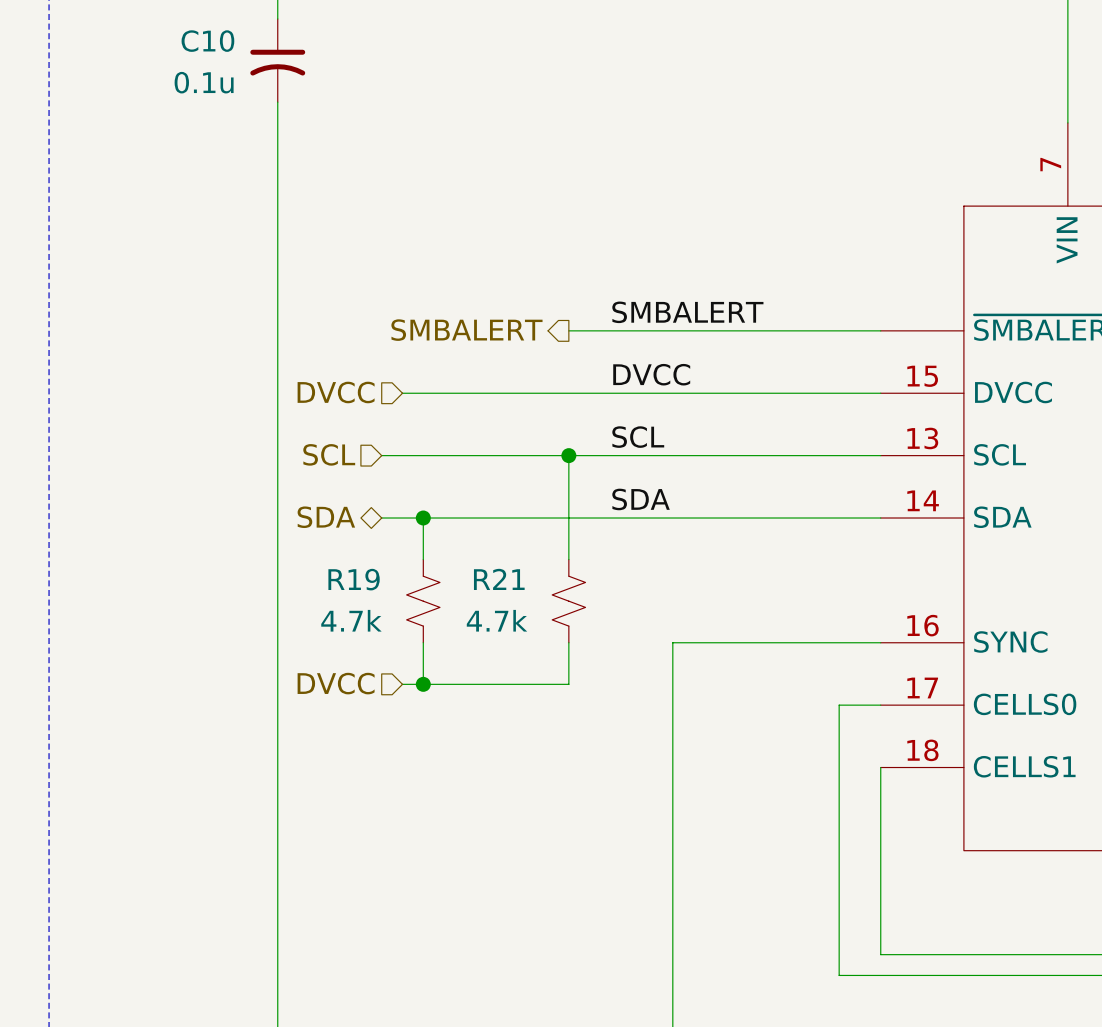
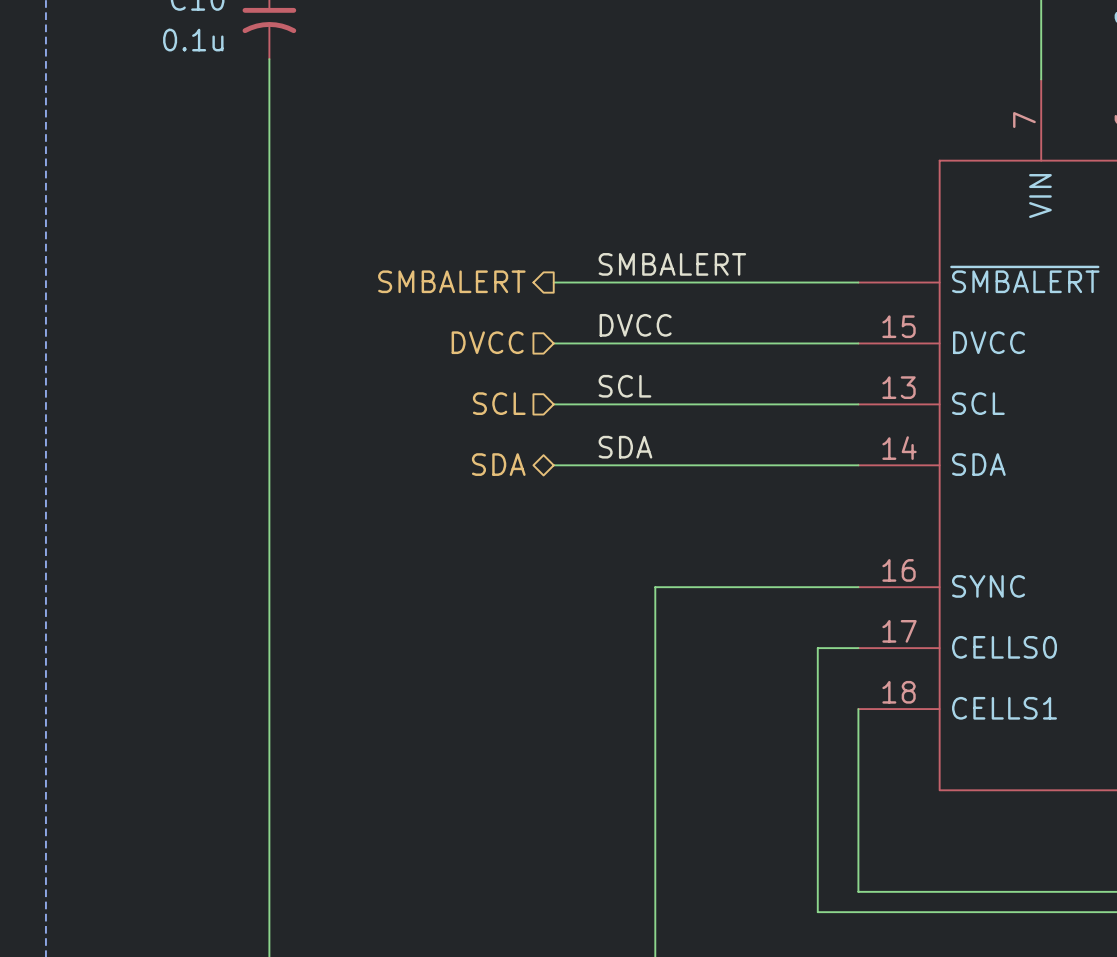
hierarchical label position: DVCC (336, 392) -> DVCC (487, 342)
wire: (402, 393) (568, 393) -> none
hierarchical label position: SCL (329, 454) -> SCL (499, 403)
wire: (381, 455) (568, 455) (568, 559) -> none
junction: (568, 455) -> none
hierarchical label position: SDA (326, 517) -> SDA (498, 464)
wire: (381, 518) (568, 518) -> none
wire: (423, 518) (423, 559) -> none
junction: (423, 518) -> none
R19: 4.7k (423, 601) -> none
R21: 4.7k (568, 601) -> none
wire: (423, 642) (423, 684) -> none
wire: (568, 642) (568, 684) (402, 684) -> none
hierarchical label: DVCC (336, 683) -> none
junction: (423, 684) -> none

